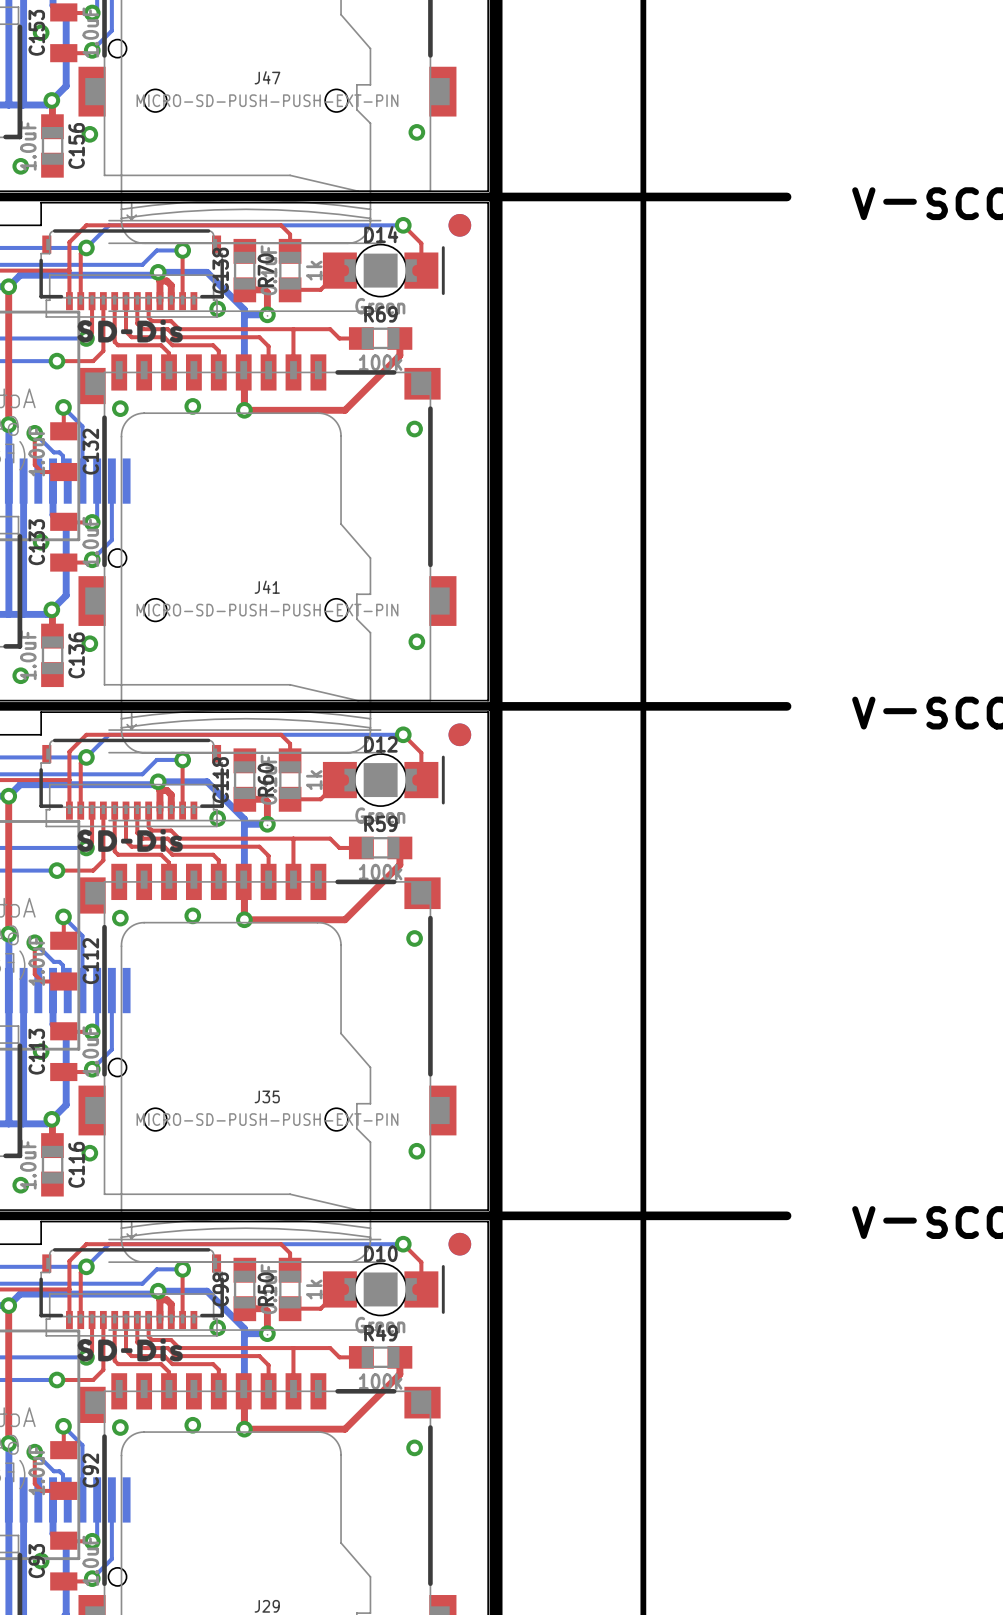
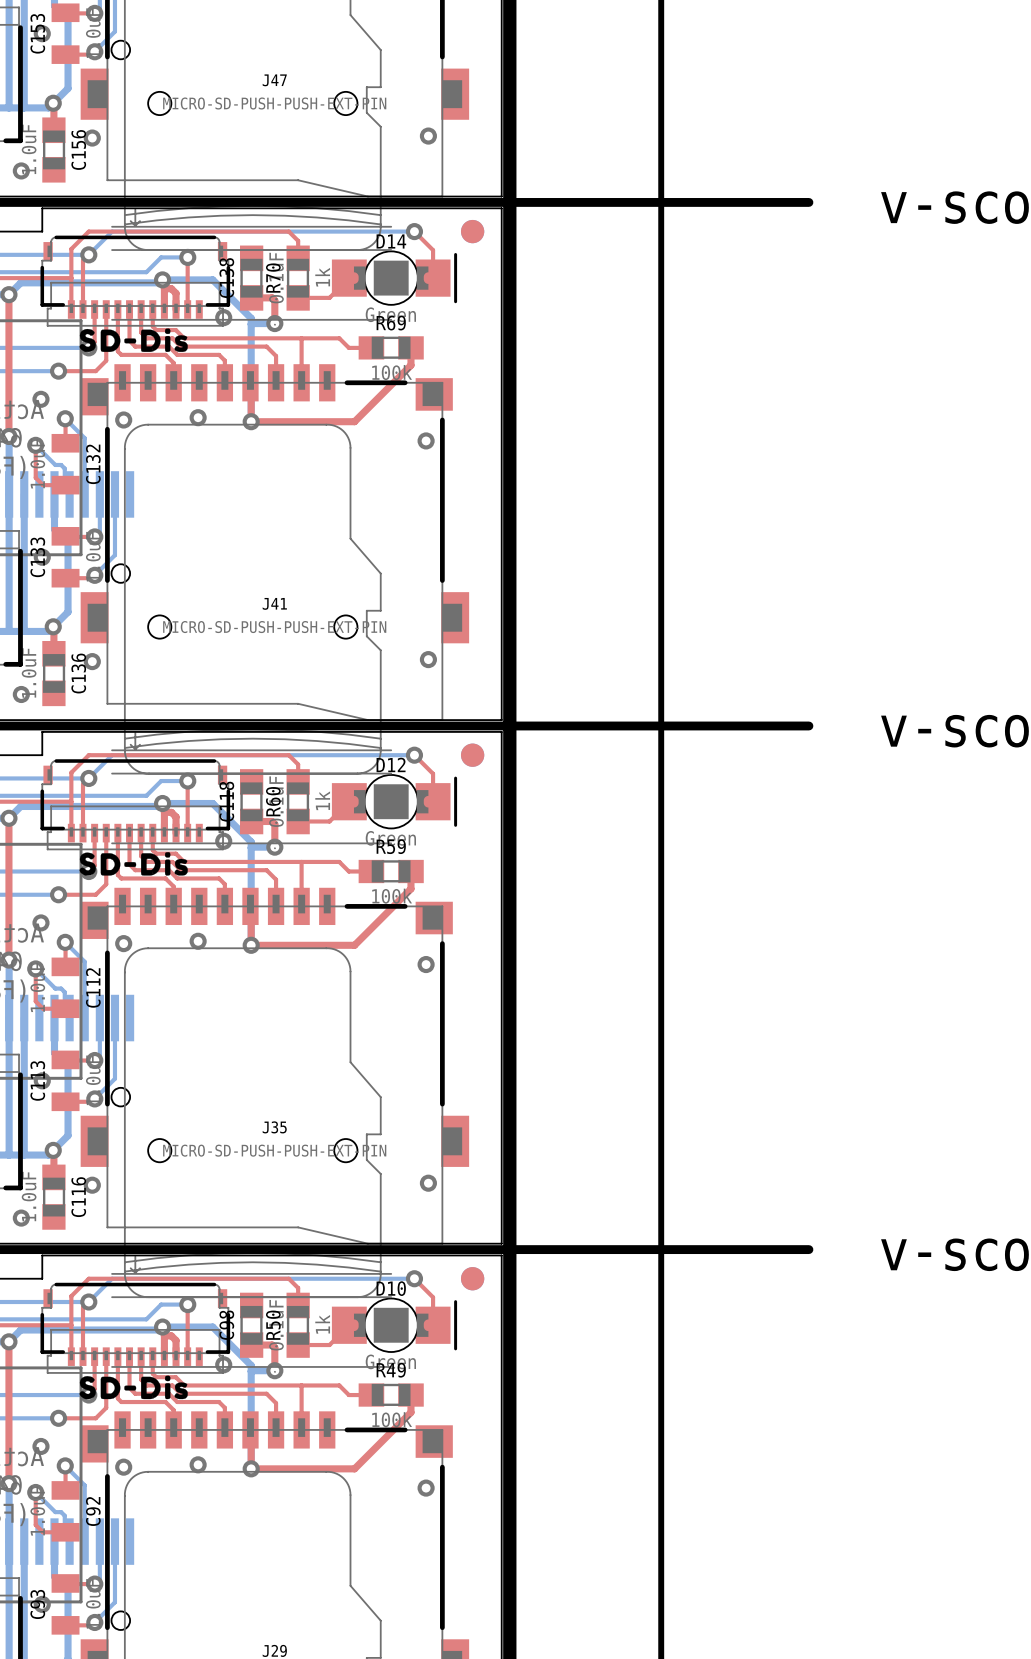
via: none -> (40, 399)
via: none -> (40, 922)
via: none -> (40, 1446)

